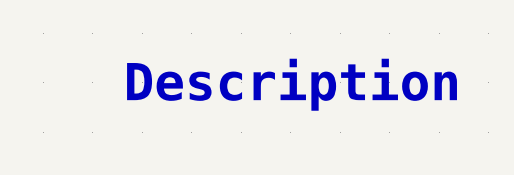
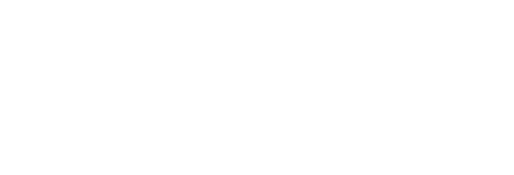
text: Description (292, 84) -> none

